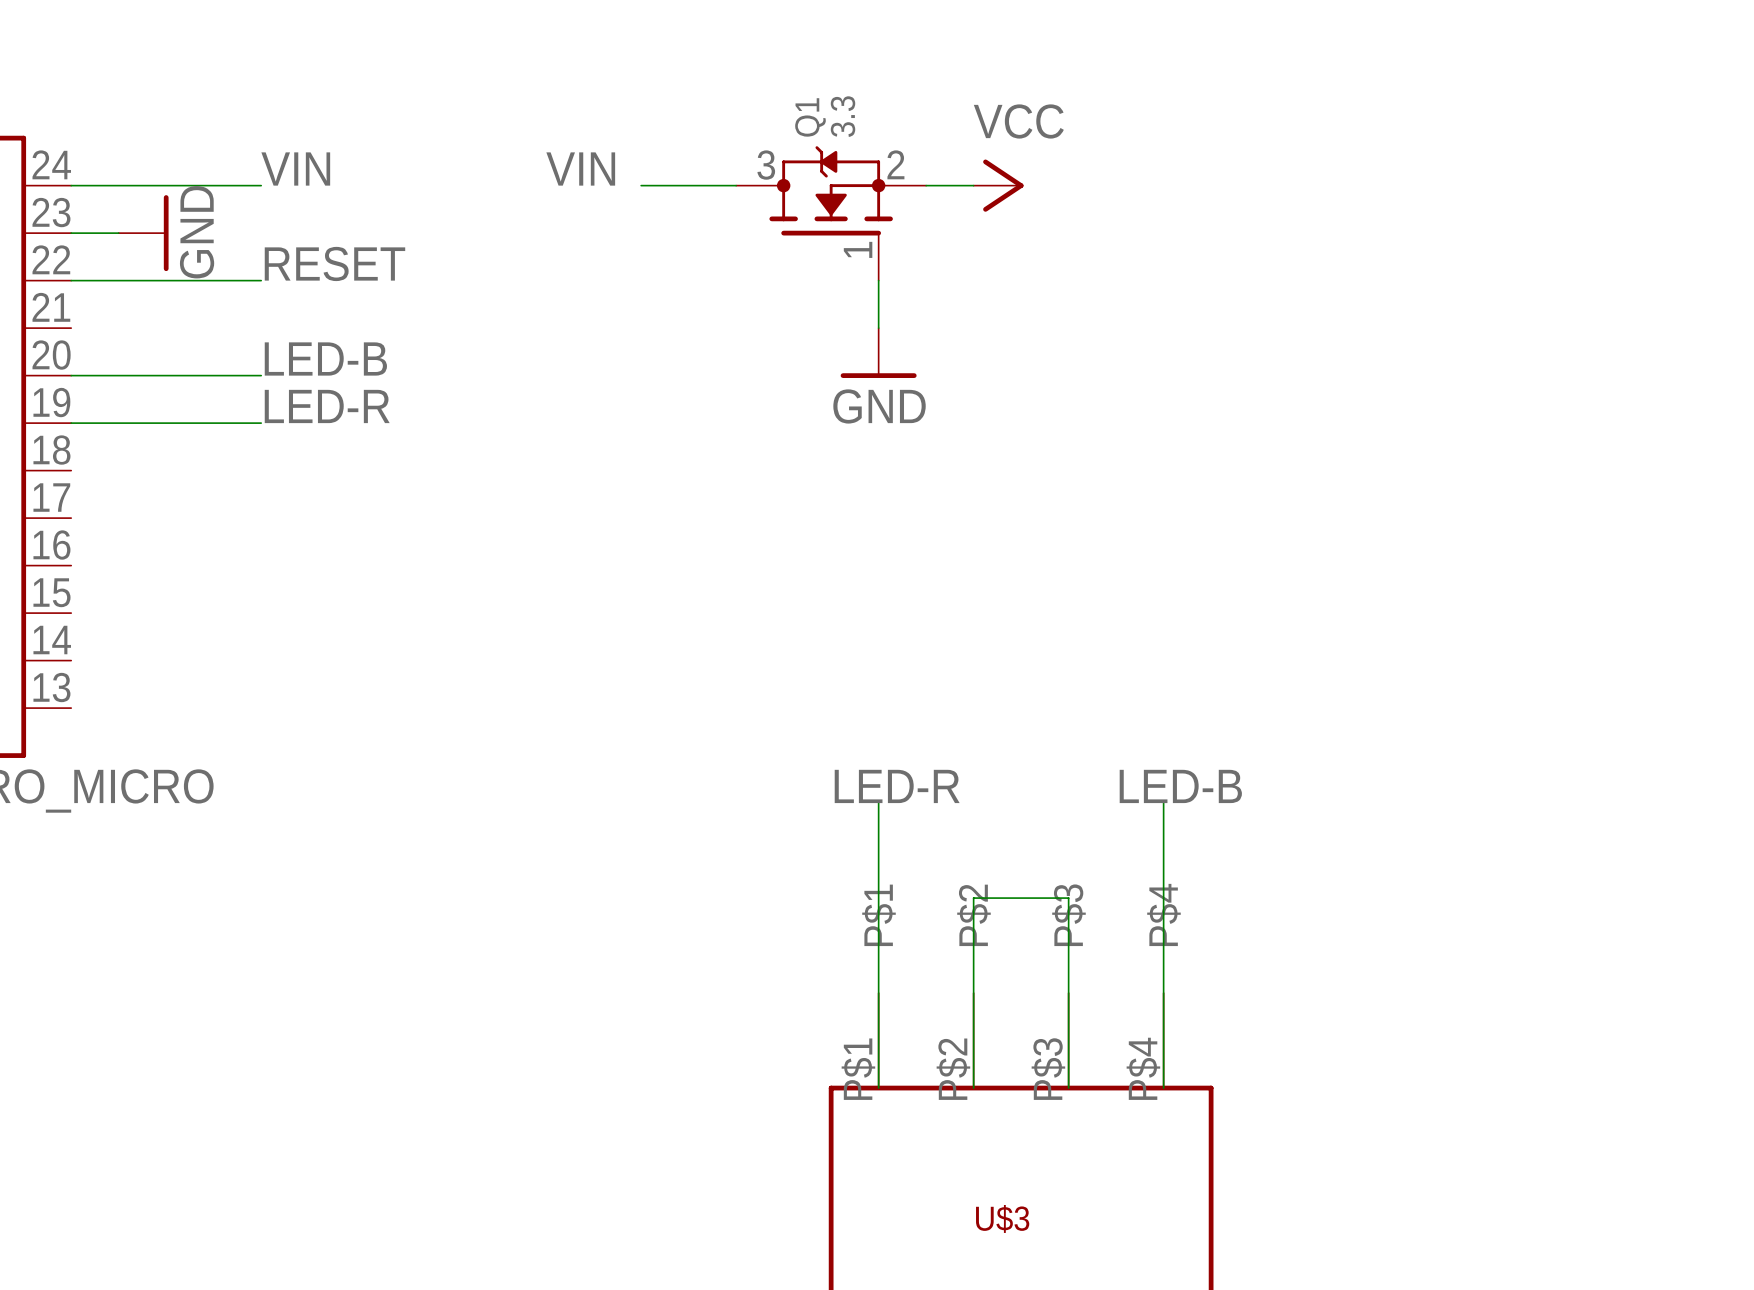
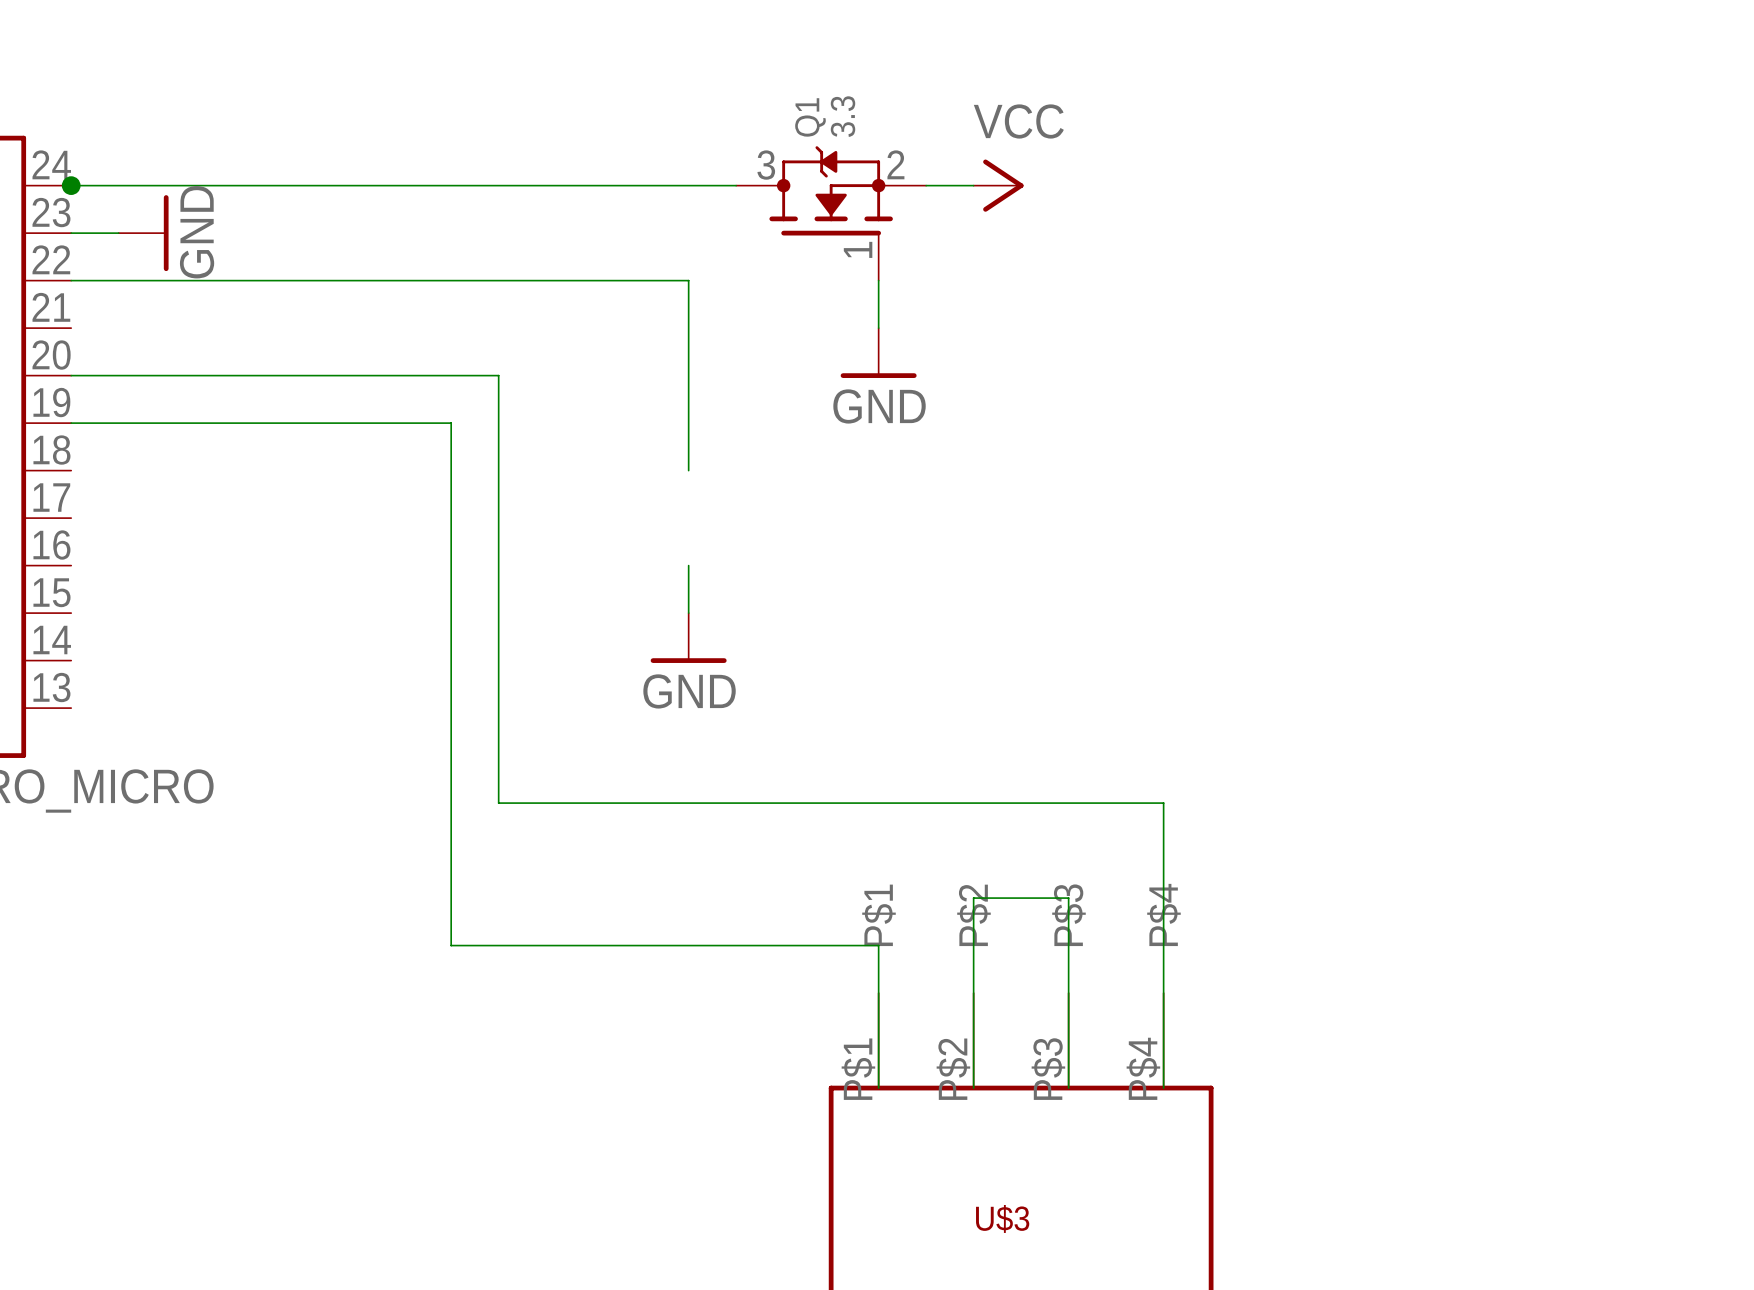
label: VIN (295, 169) -> none
label: VIN (580, 169) -> none
junction: none -> (71, 185)
wire: none -> (261, 185) (641, 185)
label: RESET (334, 263) -> none
wire: none -> (261, 280) (688, 280) (688, 470)
label: LED-B (325, 358) -> none
wire: none -> (261, 375) (498, 375) (498, 803) (1163, 803)
label: LED-R (327, 406) -> none
wire: none -> (688, 565) (688, 613)
power symbol: none -> GND (688, 638)
label: LED-R (897, 786) -> none
label: LED-B (1180, 786) -> none
wire: (878, 803) (878, 945) -> (261, 423) (451, 423) (451, 945) (878, 945)

